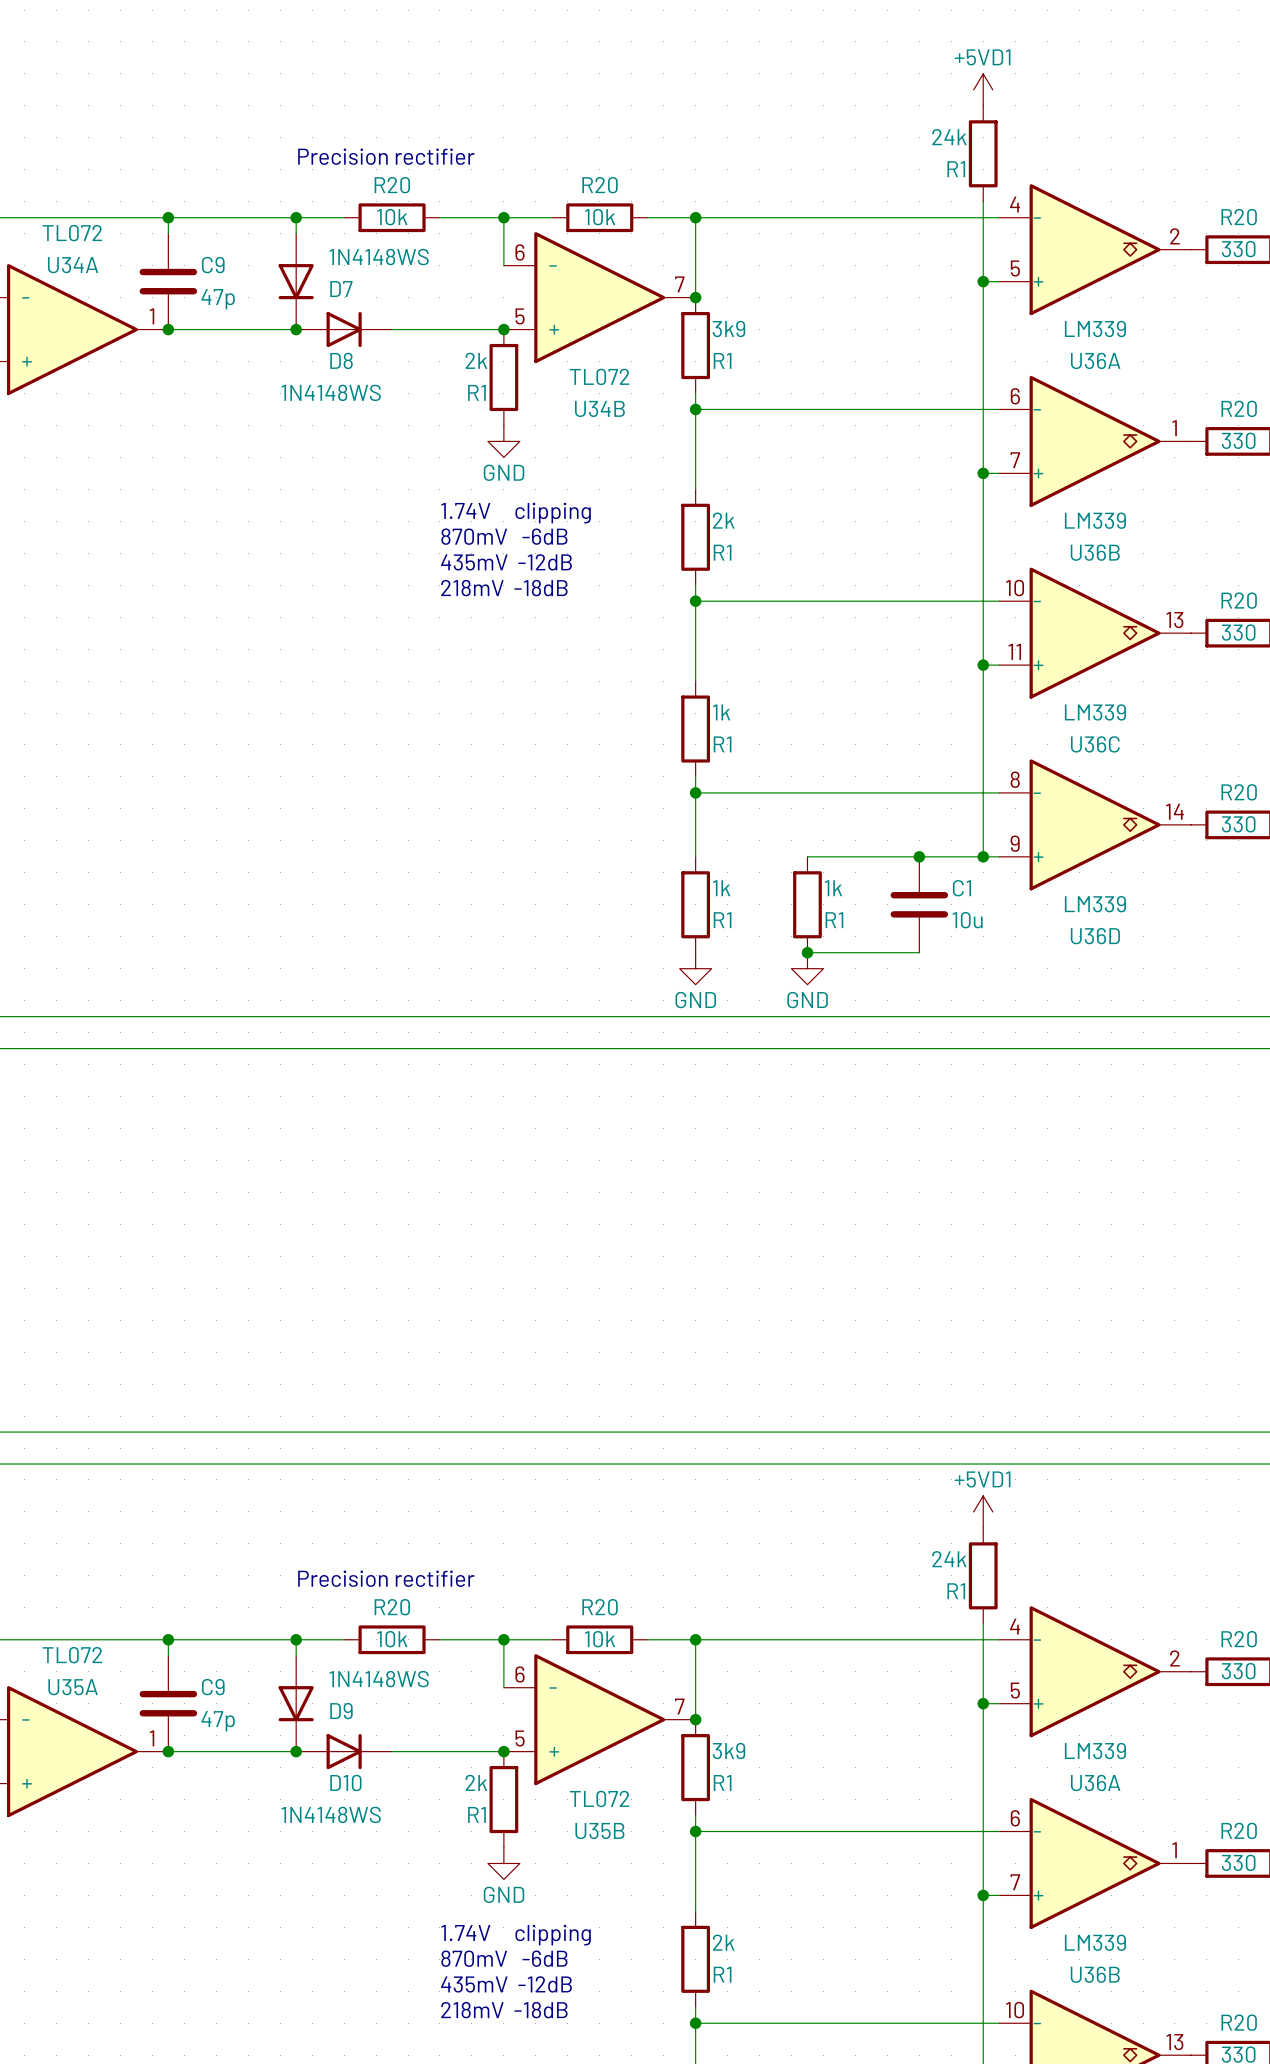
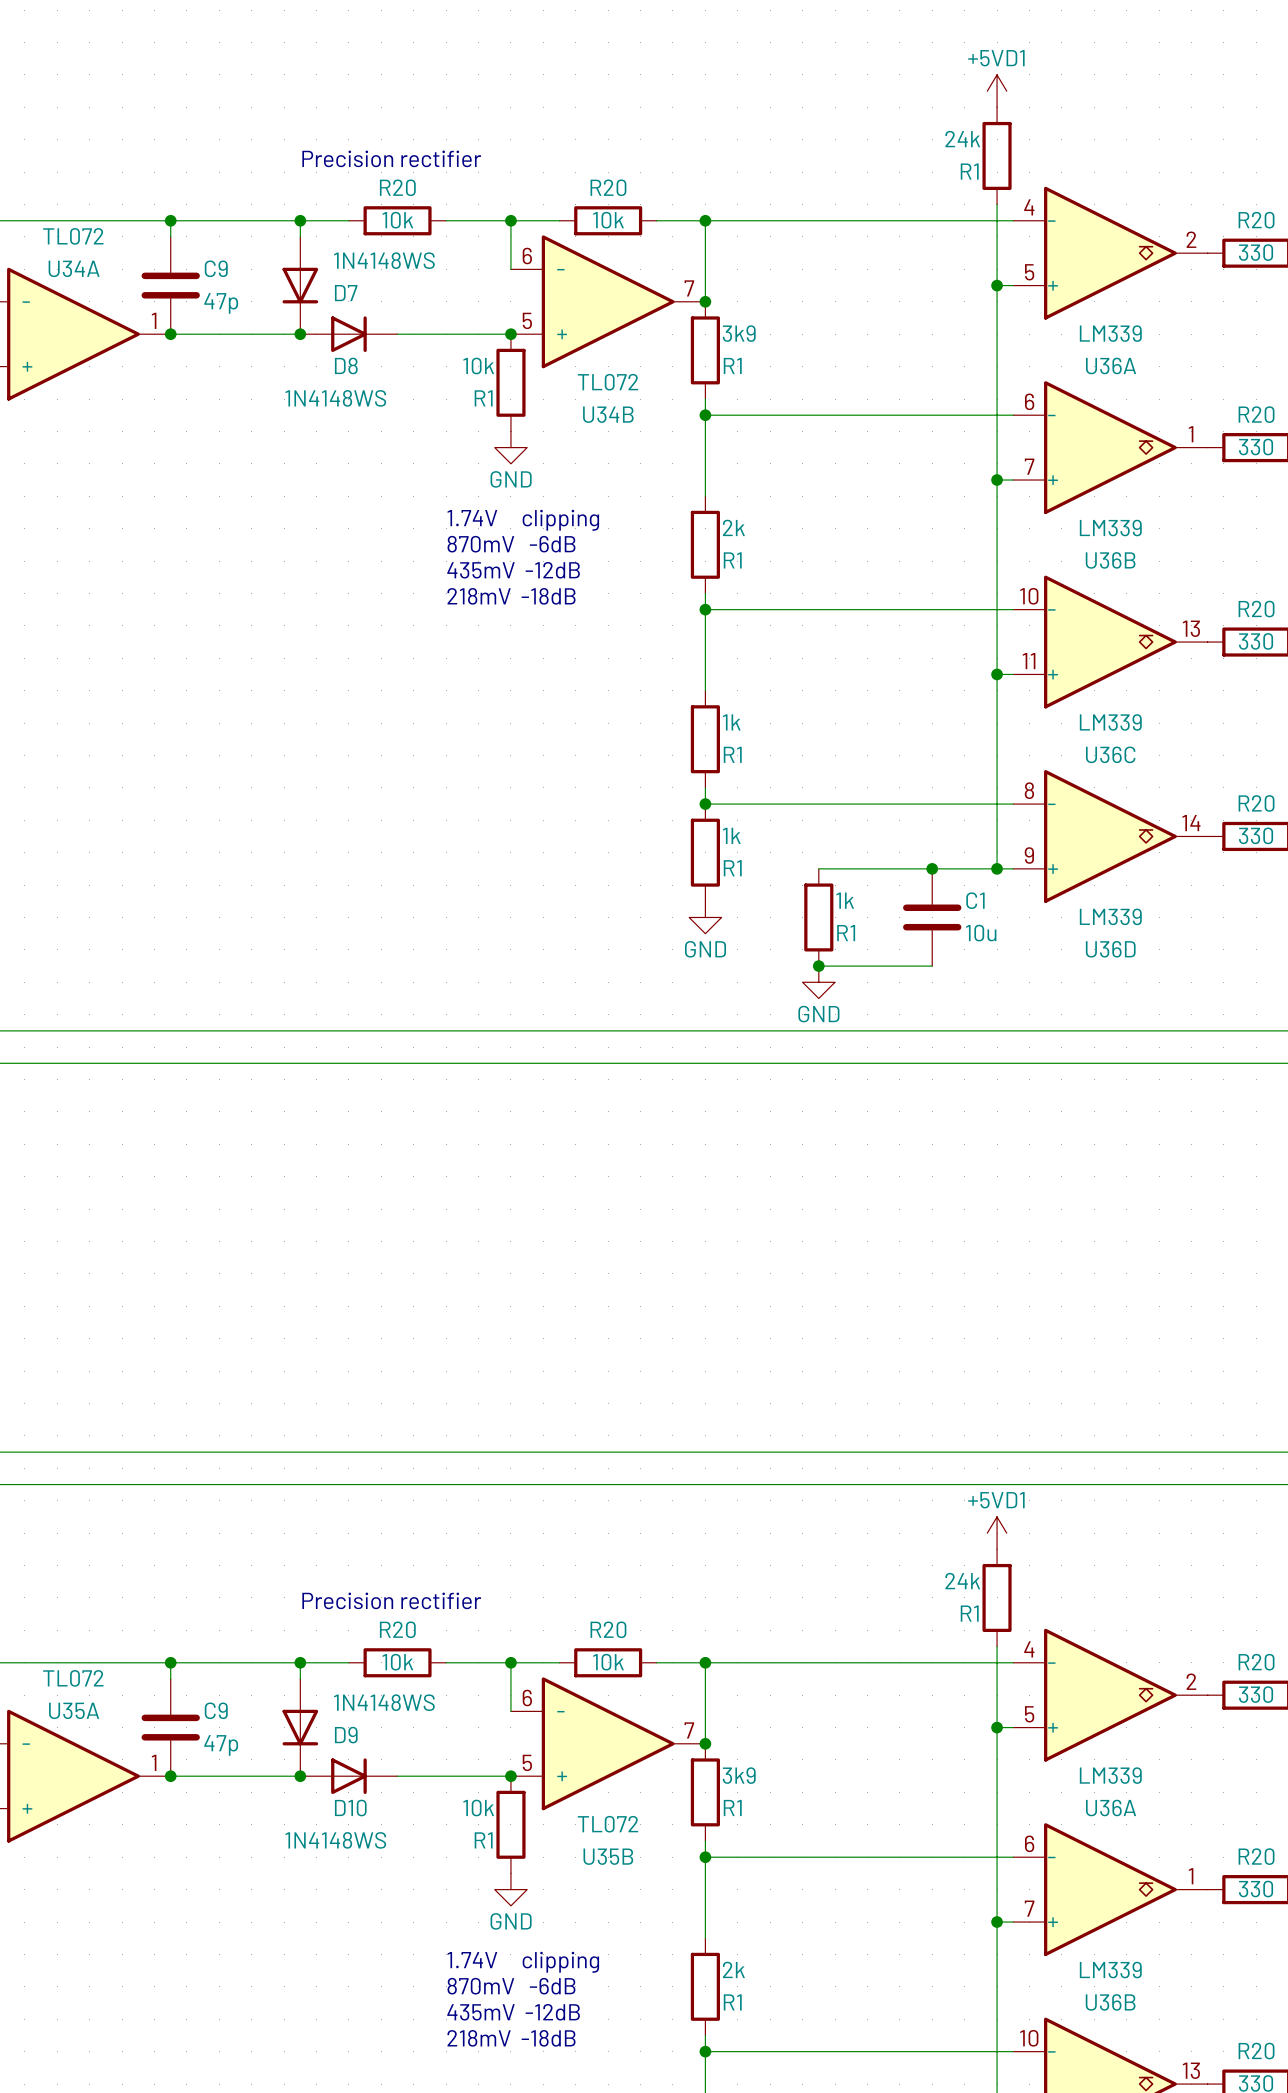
R1 value: 2k (476, 360) -> 10k (478, 366)
wire: (695, 792) (695, 856) -> none
R1 position: (695, 904) -> (705, 852)
power symbol position: GND (695, 968) -> GND (705, 917)
R1 value: 2k (476, 1782) -> 10k (478, 1808)

